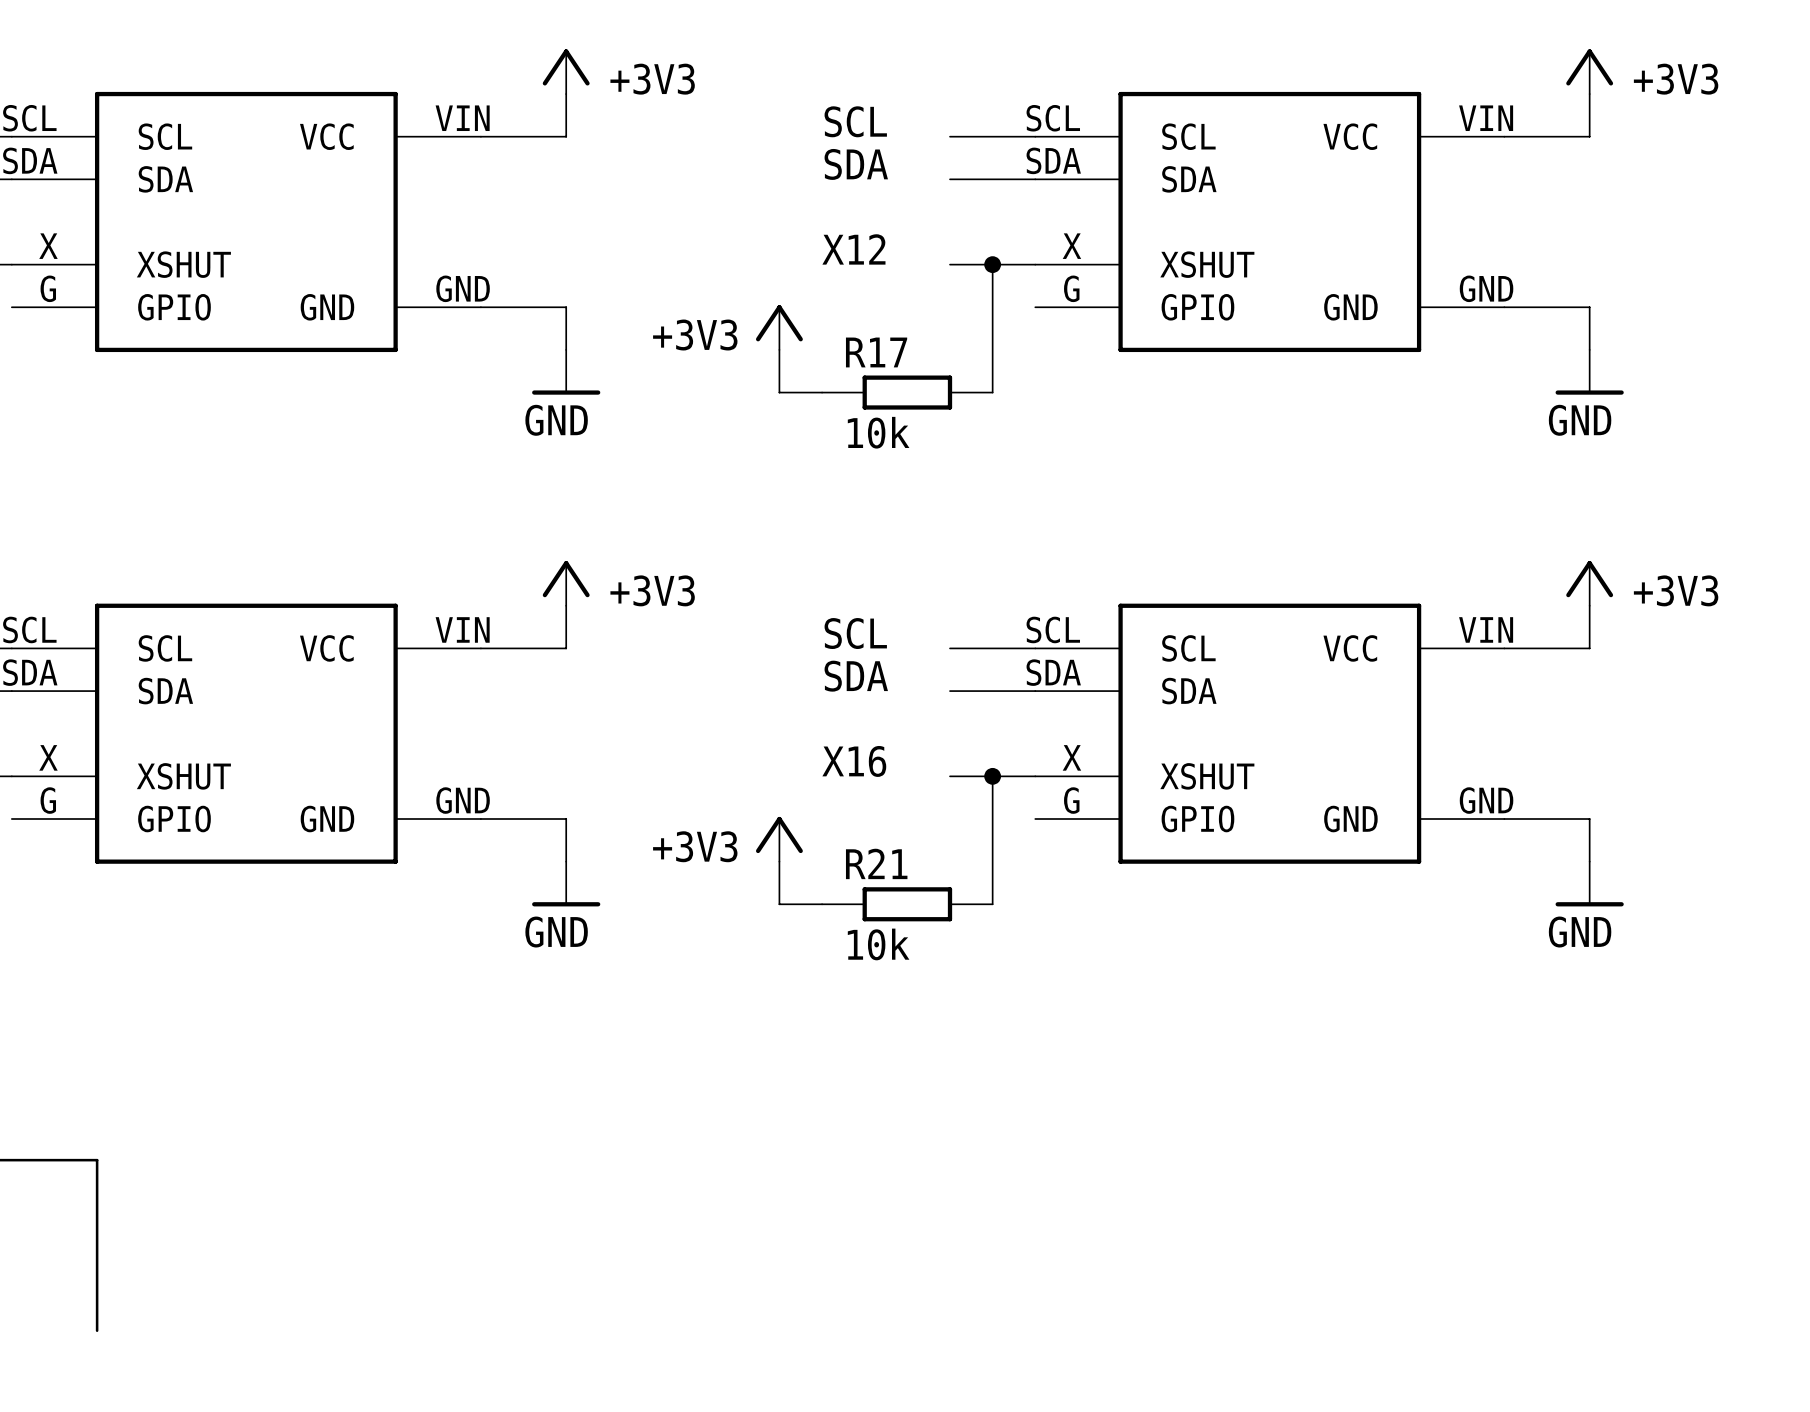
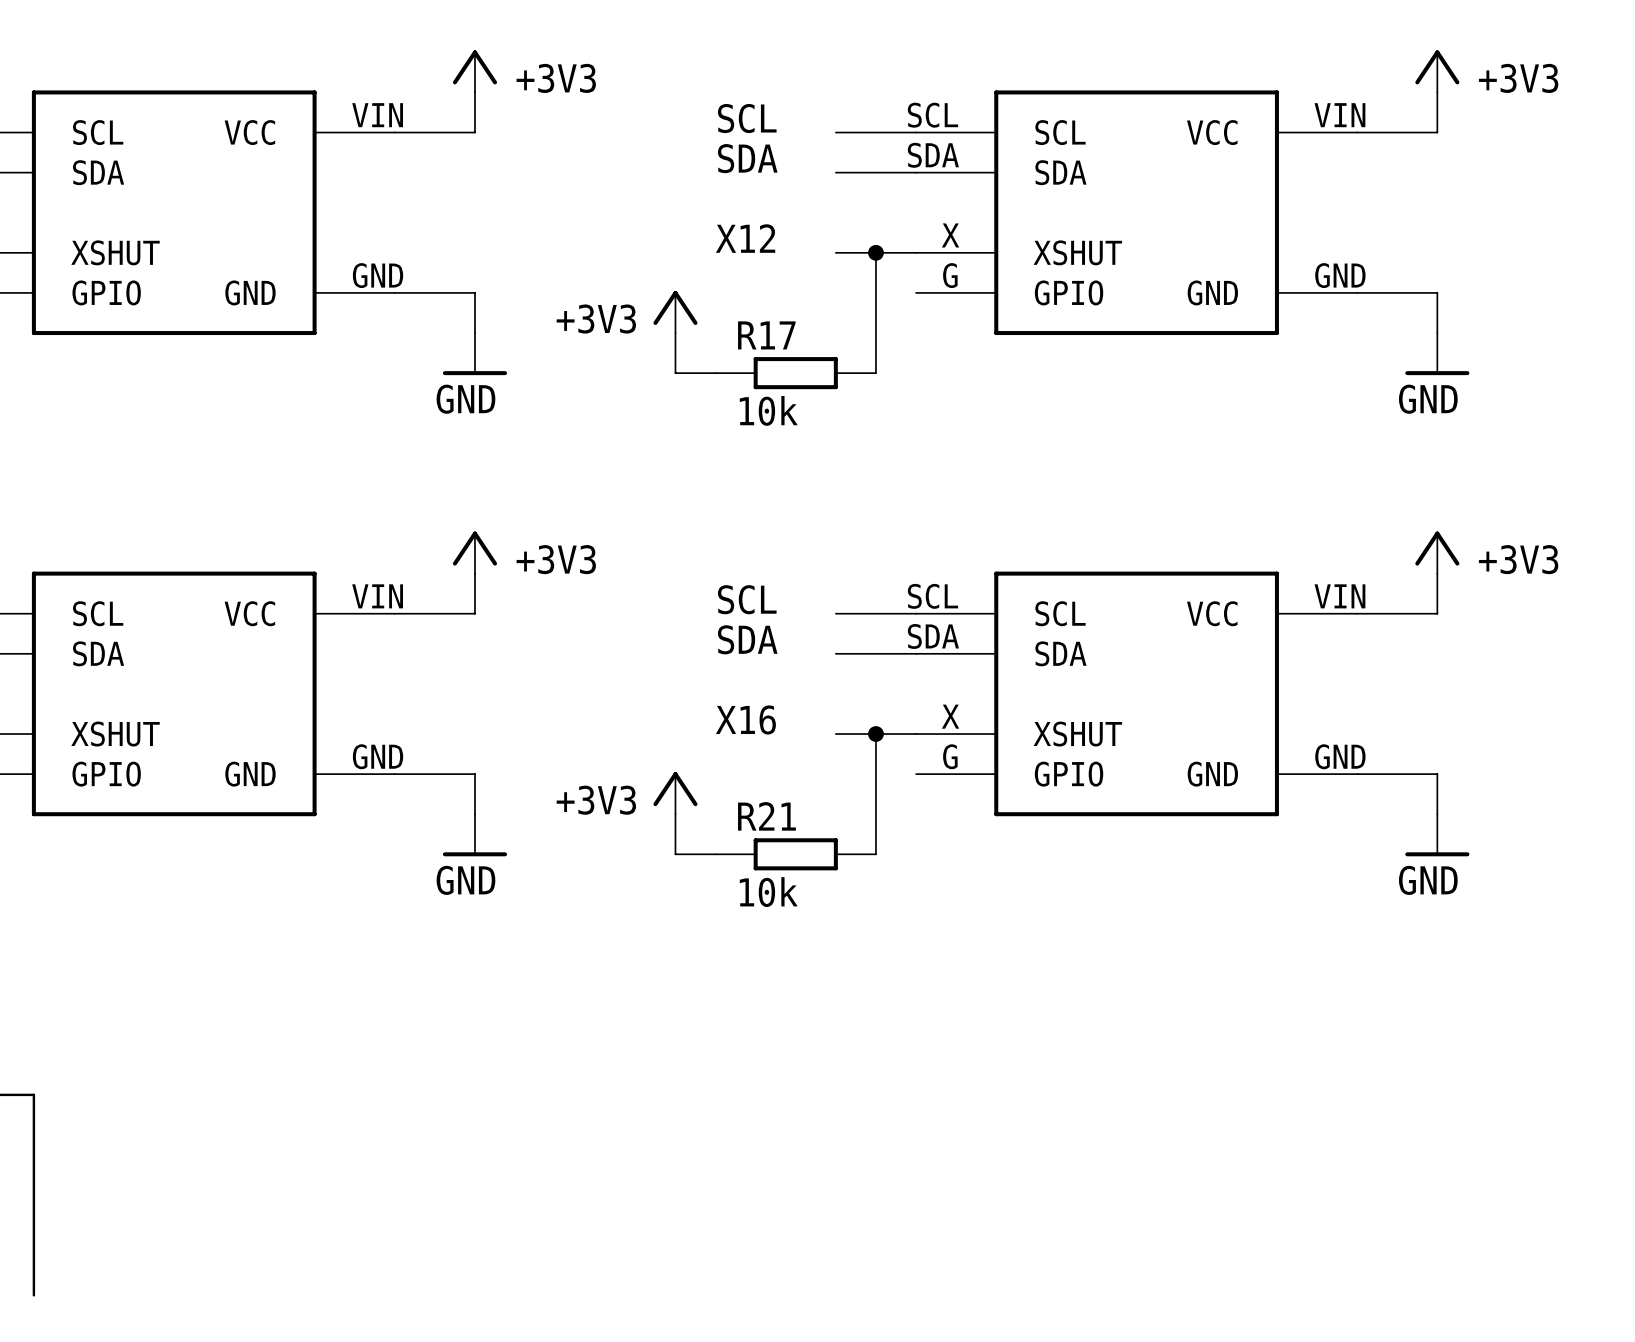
line: none -> (33, 1255) (33, 1295)

